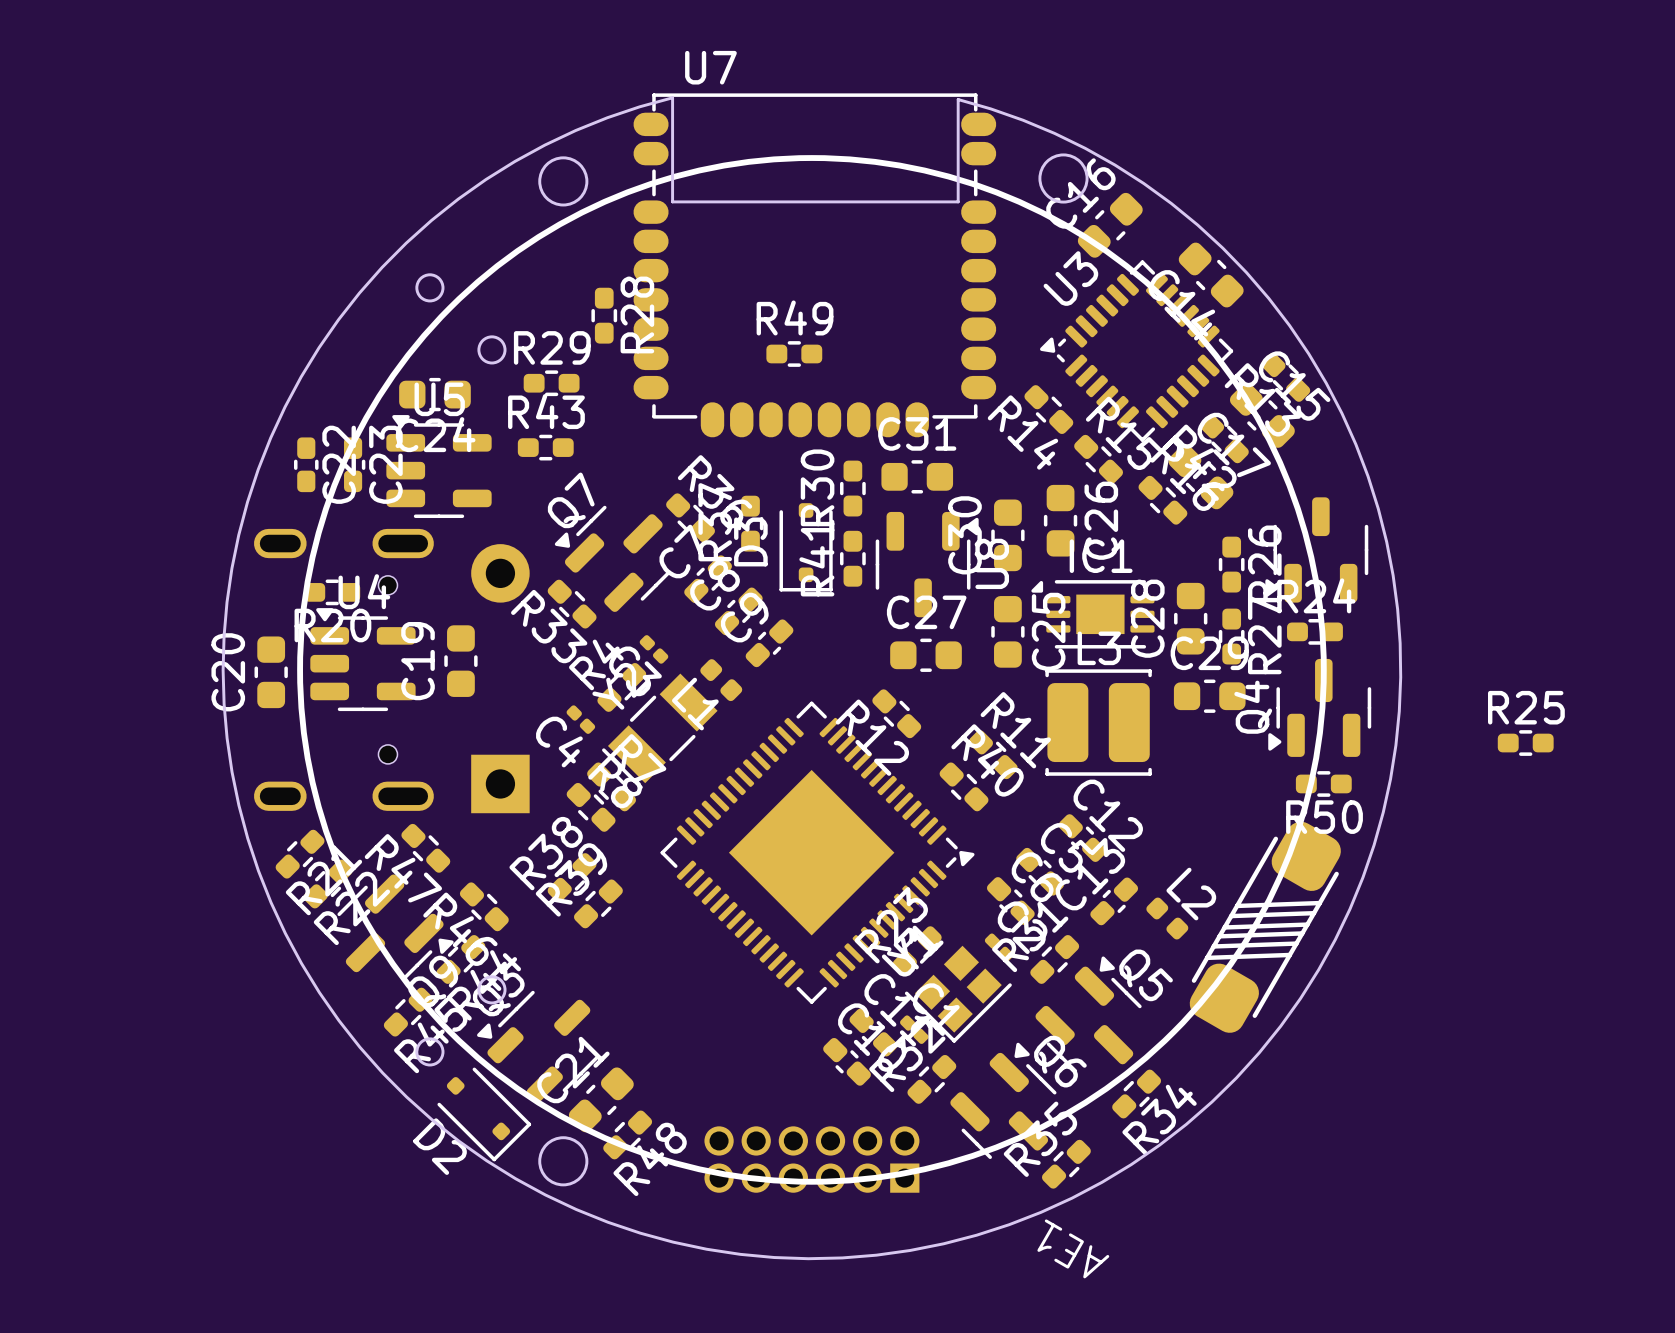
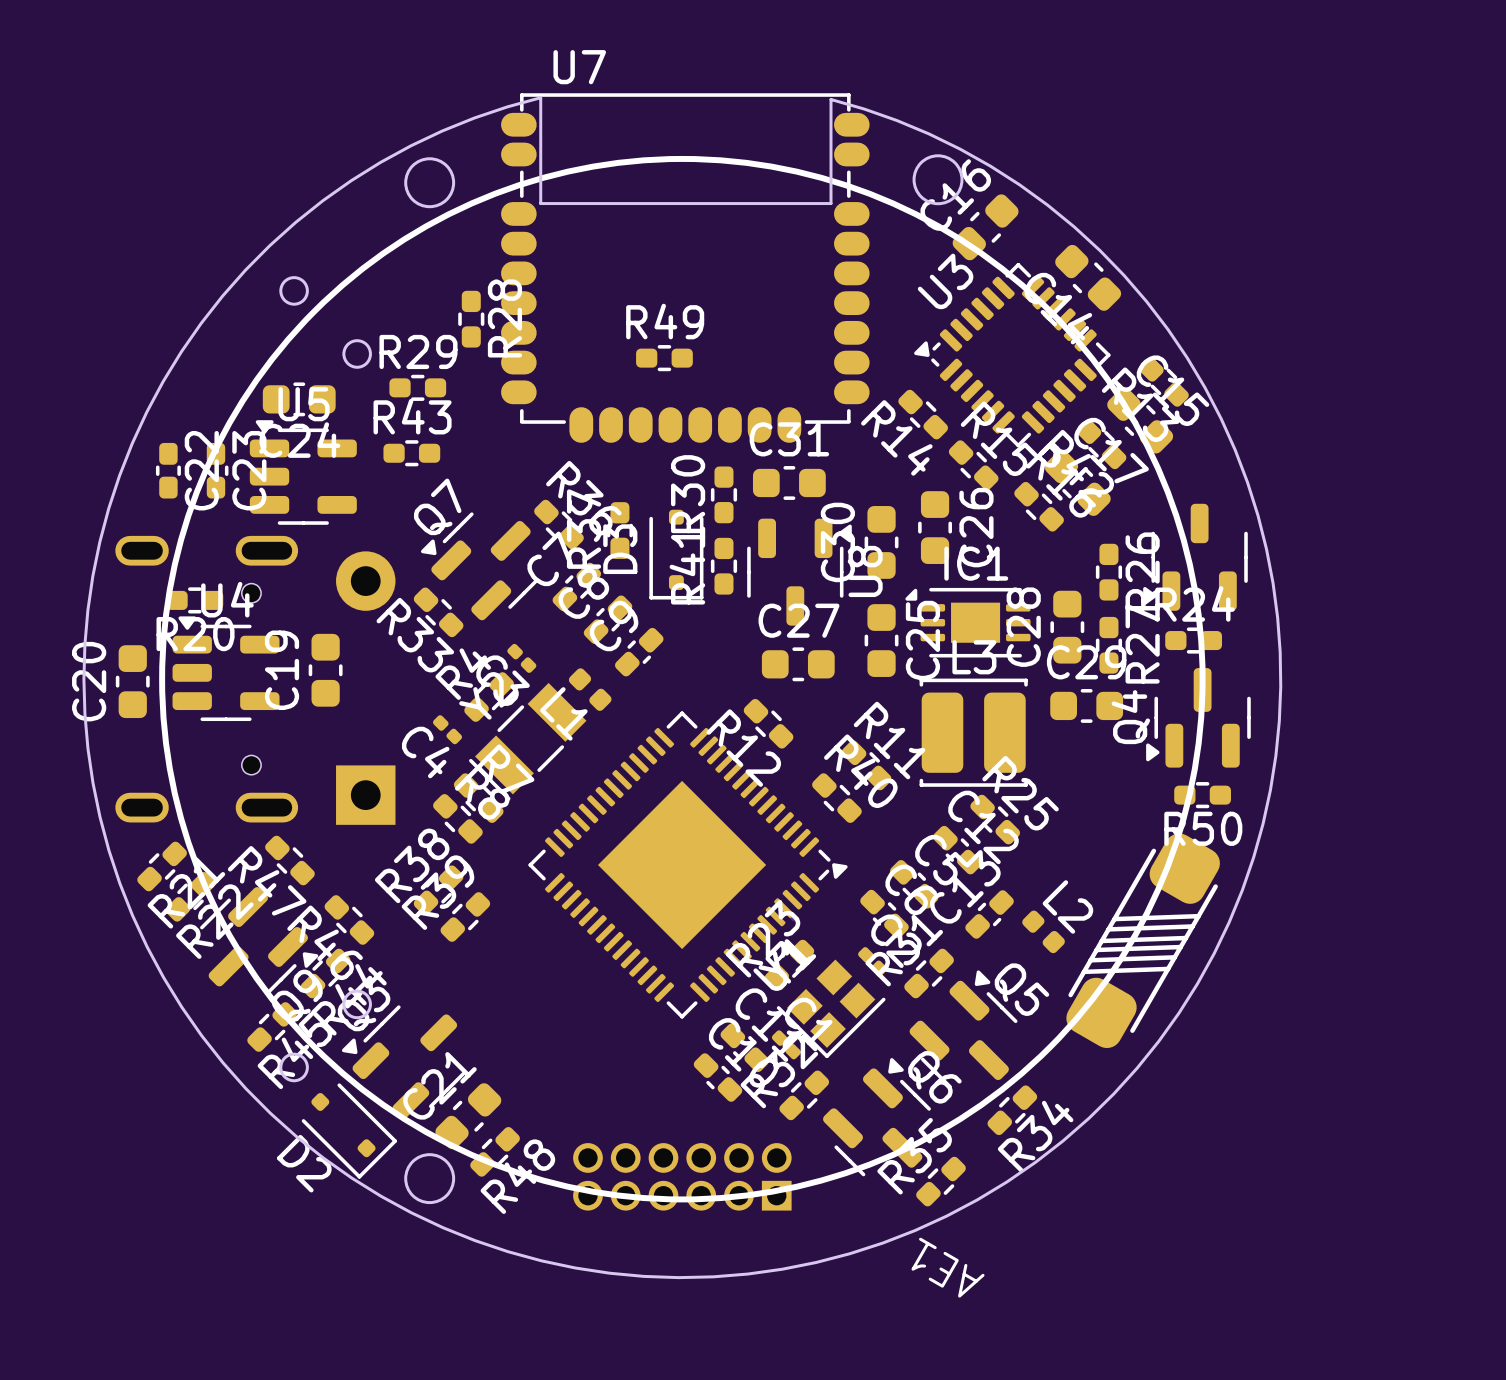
R25 rotation: 0° (1525, 743) -> 45° clockwise (995, 819)
R25 position: (1525, 743) -> (995, 819)

